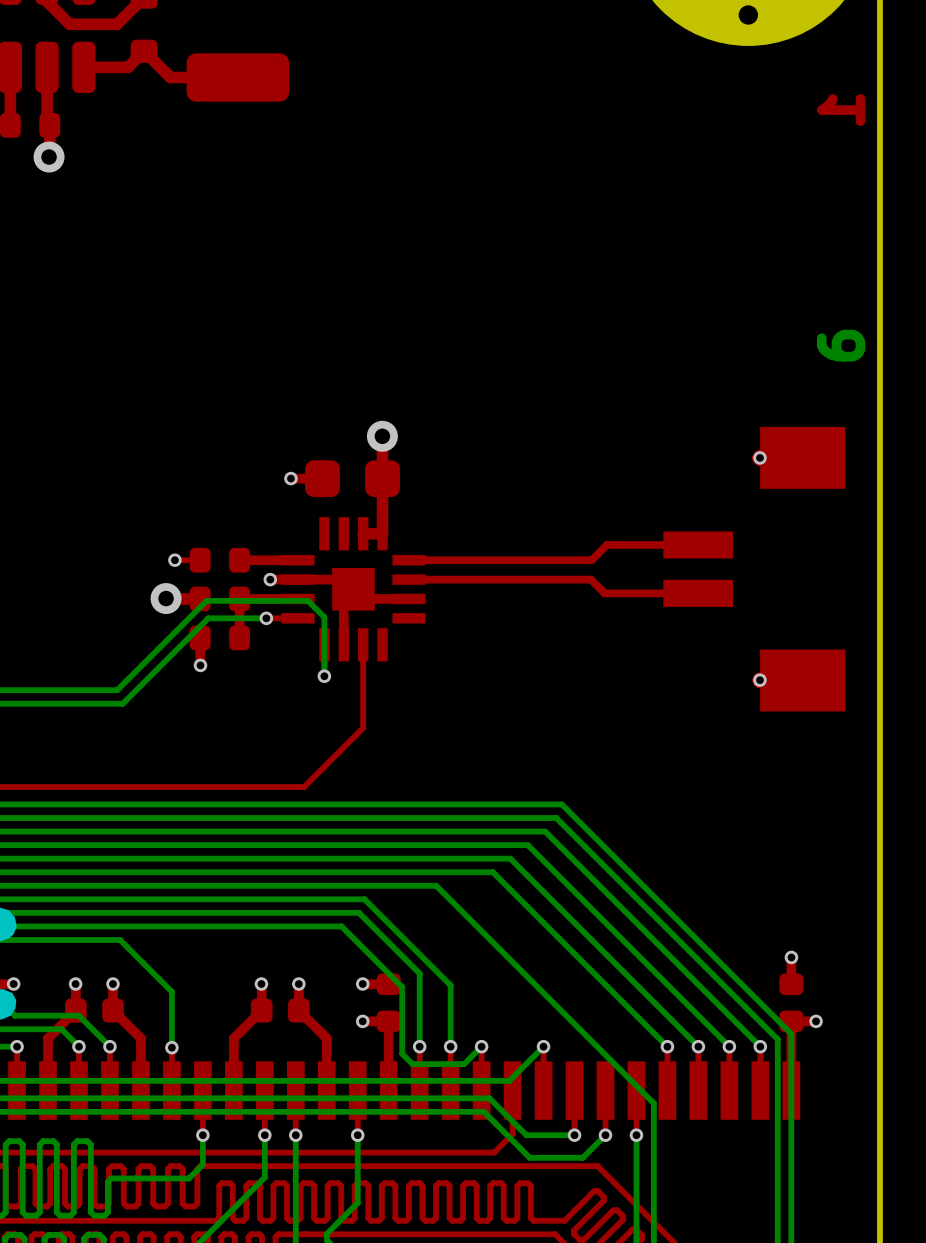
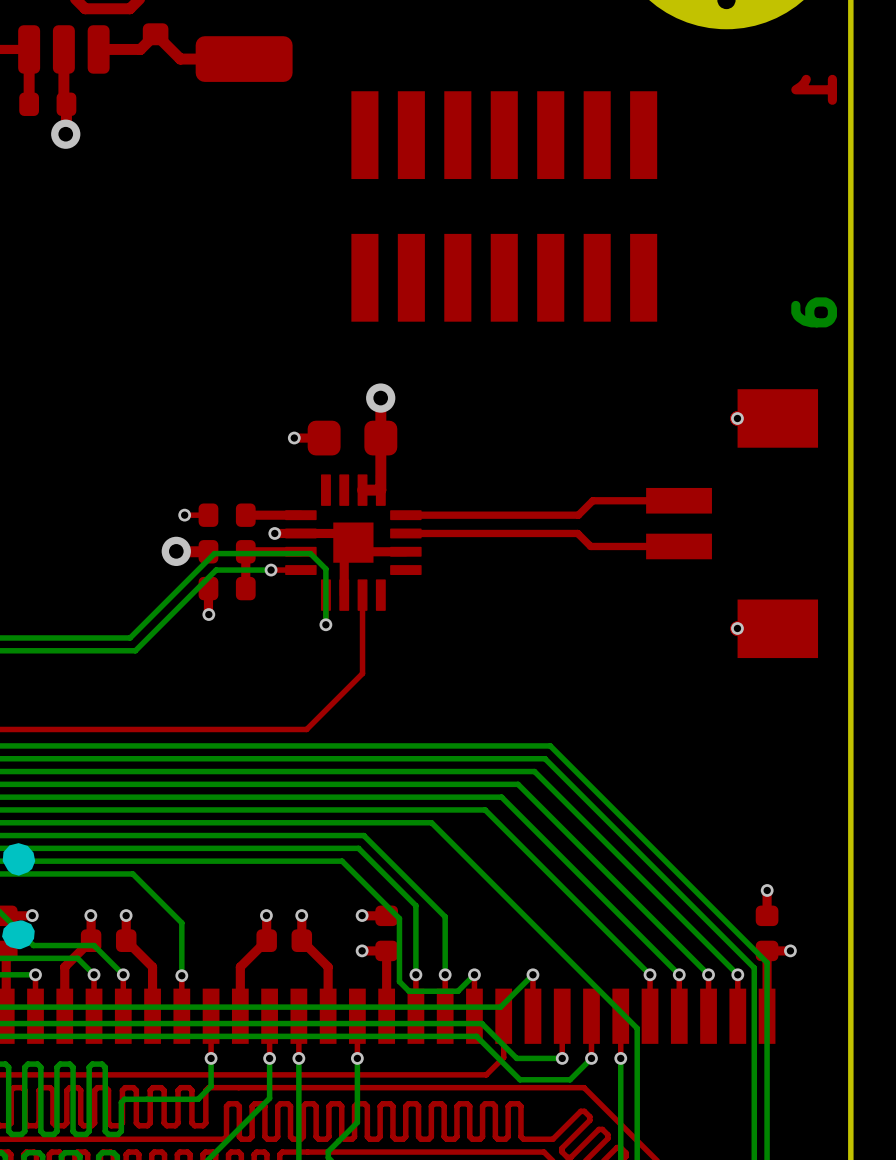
part: none -> (504, 206)

